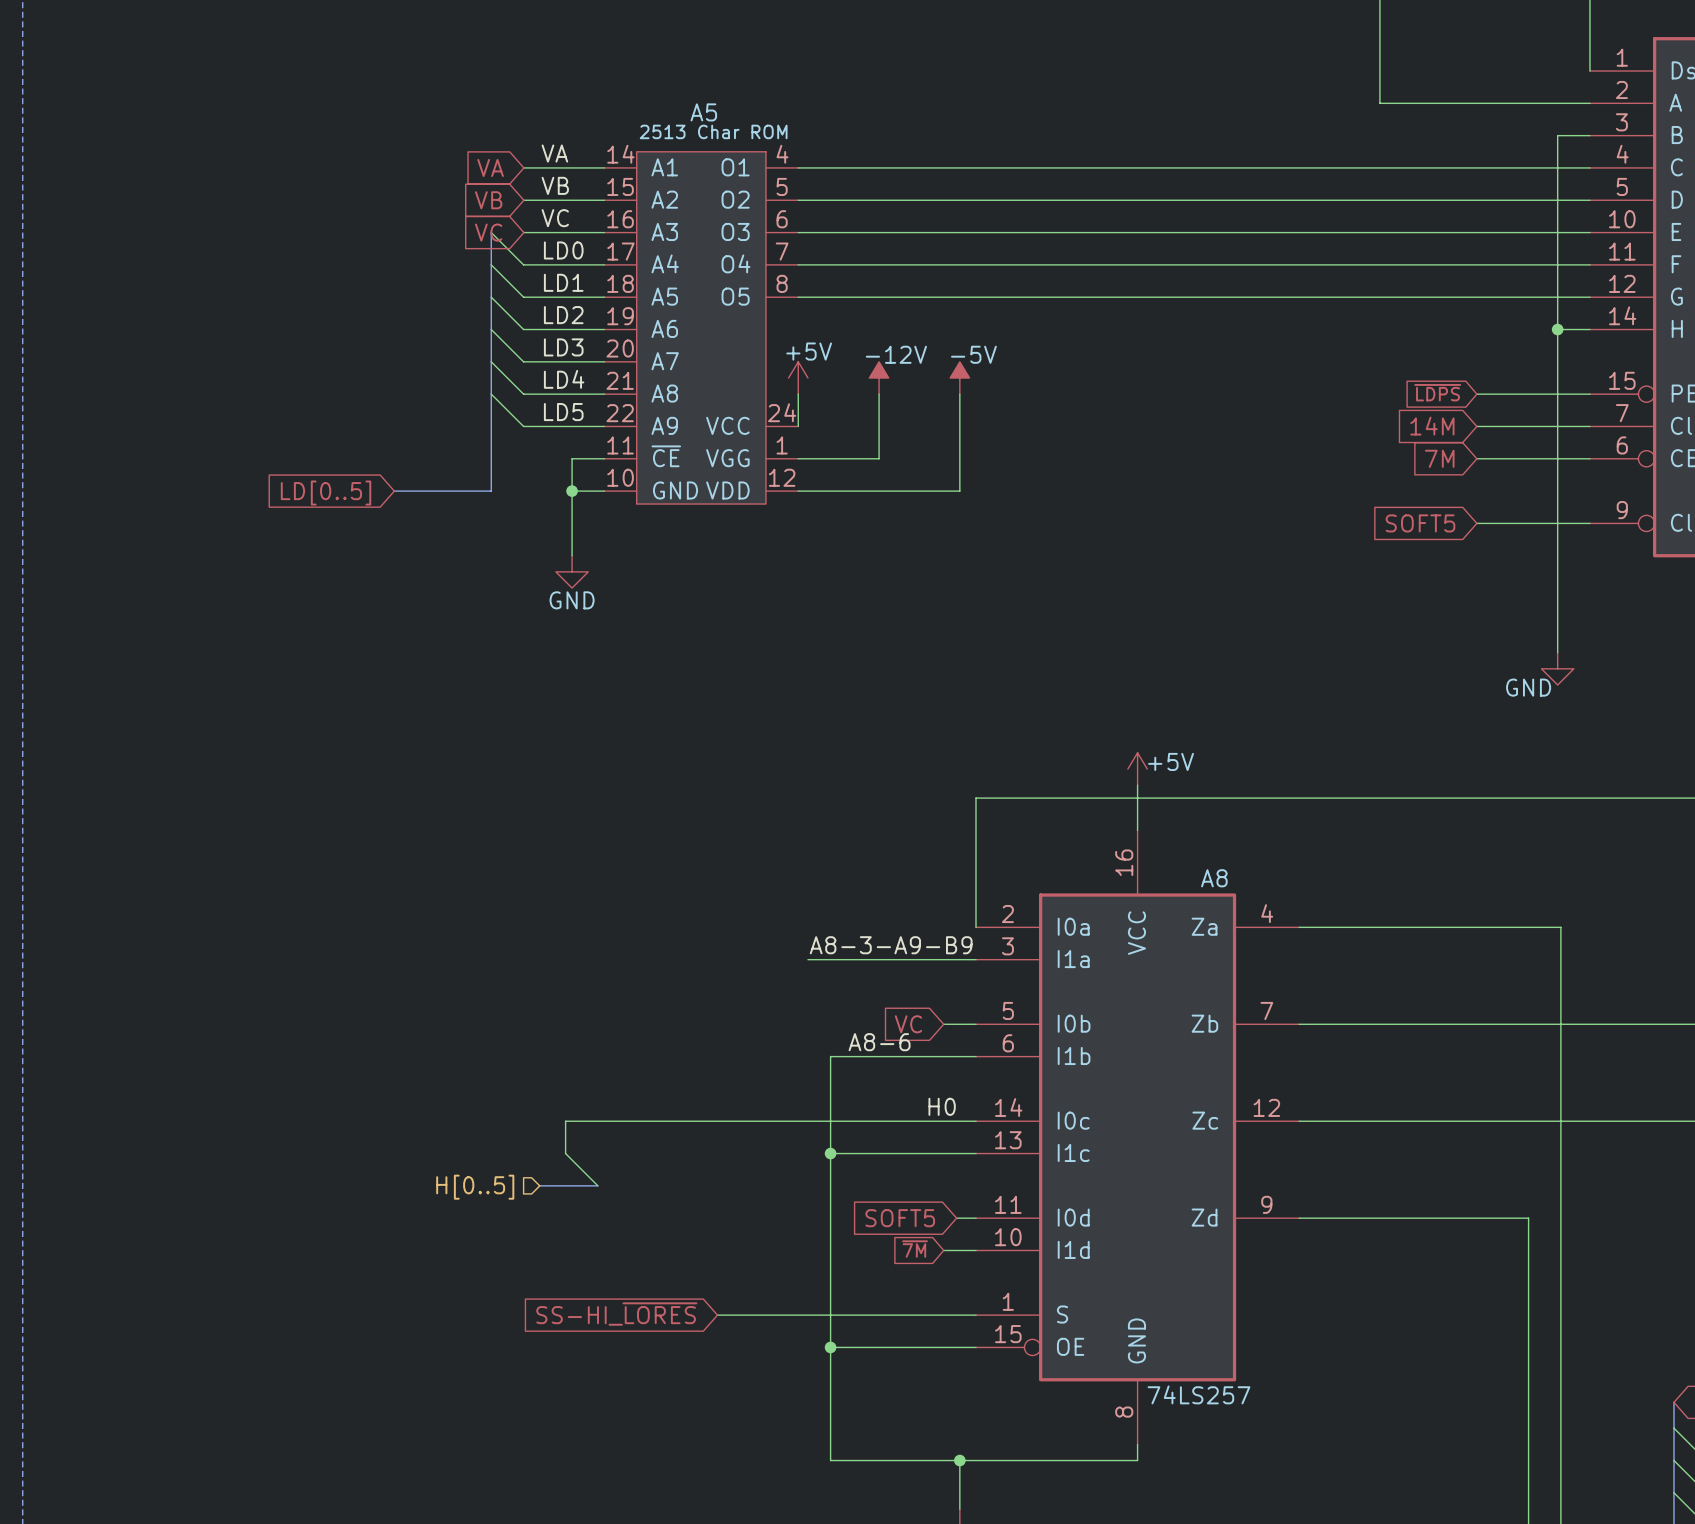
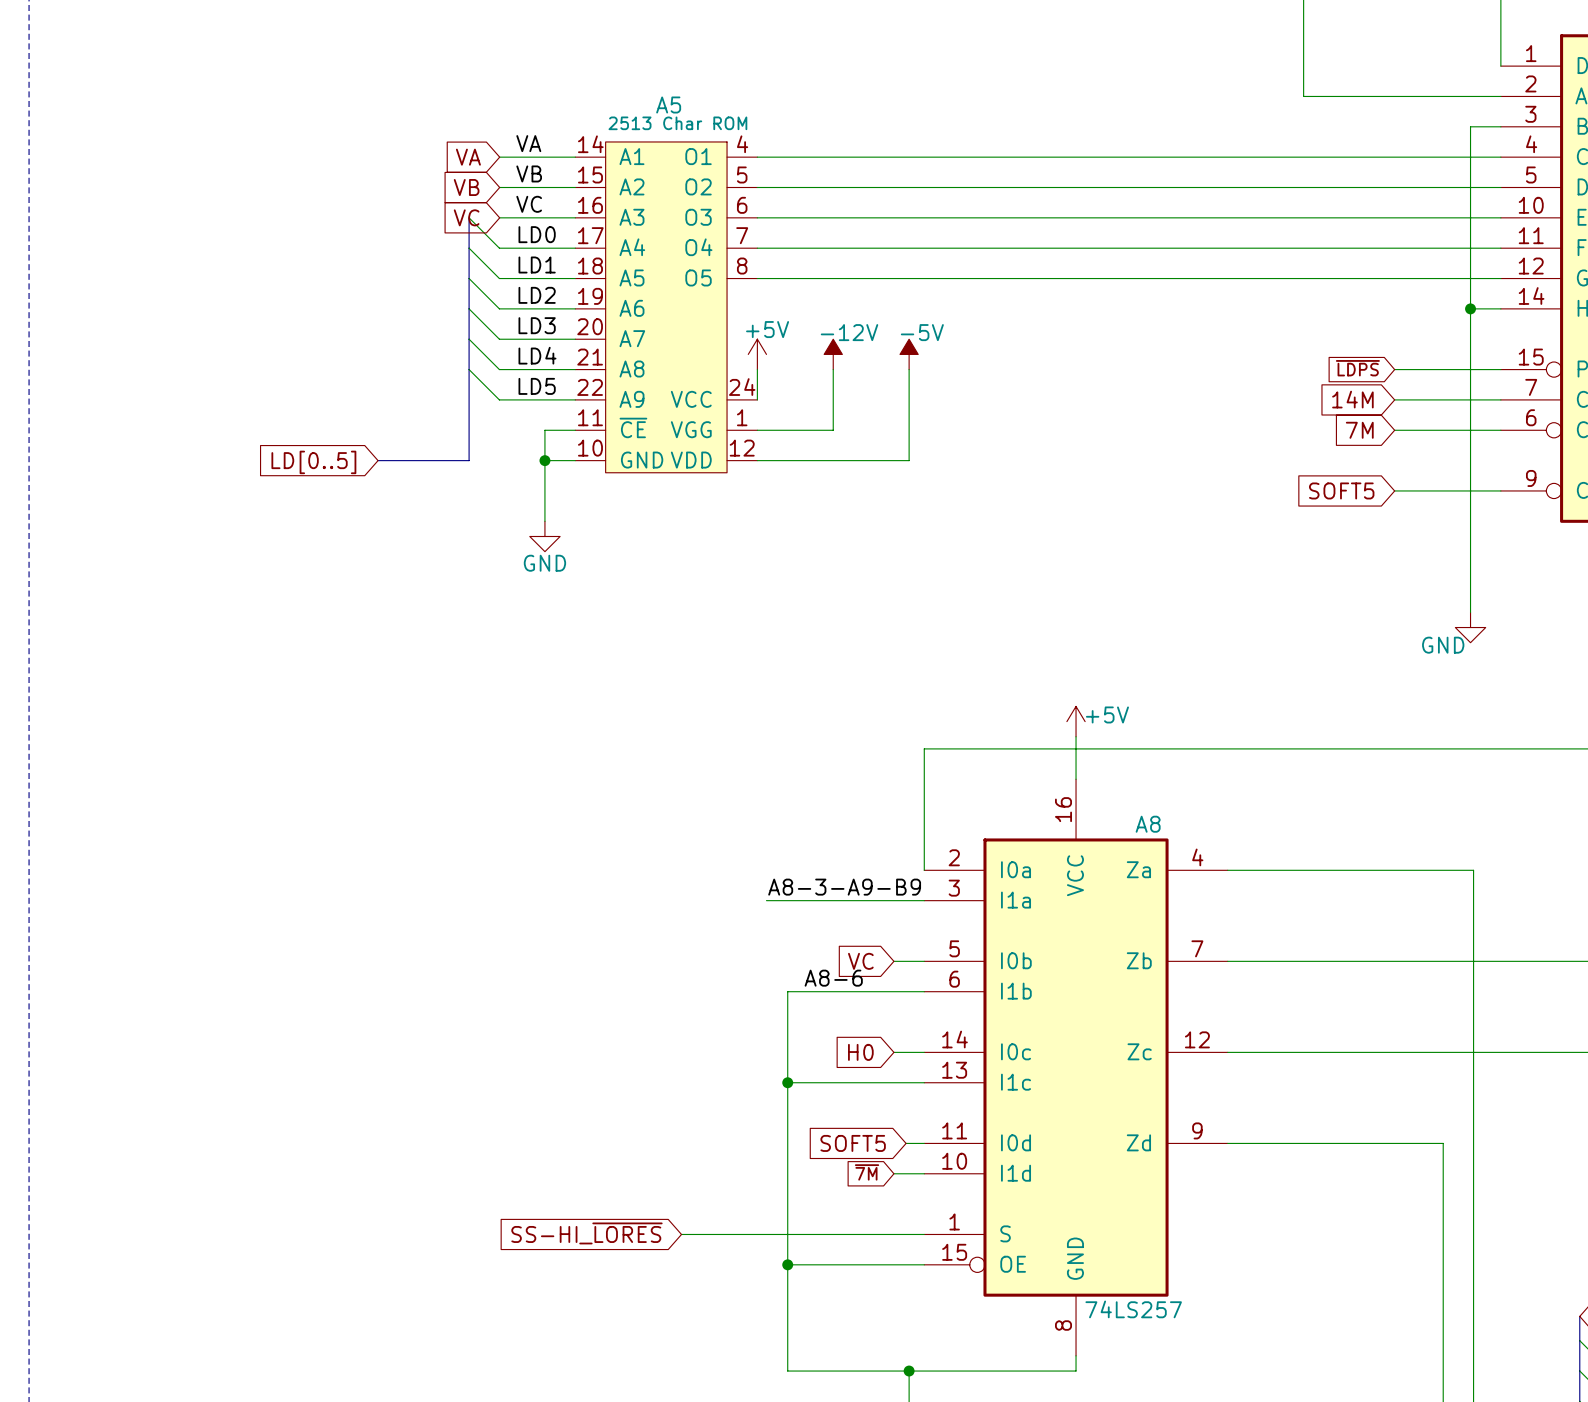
label: H0 (942, 1106) -> none
global label: none -> H0 (860, 1052)
wire: (943, 1121) (565, 1121) (565, 1153) (597, 1185) -> none
bus: (539, 1185) (597, 1185) -> none
hierarchical label: H[0..5] (475, 1187) -> none

